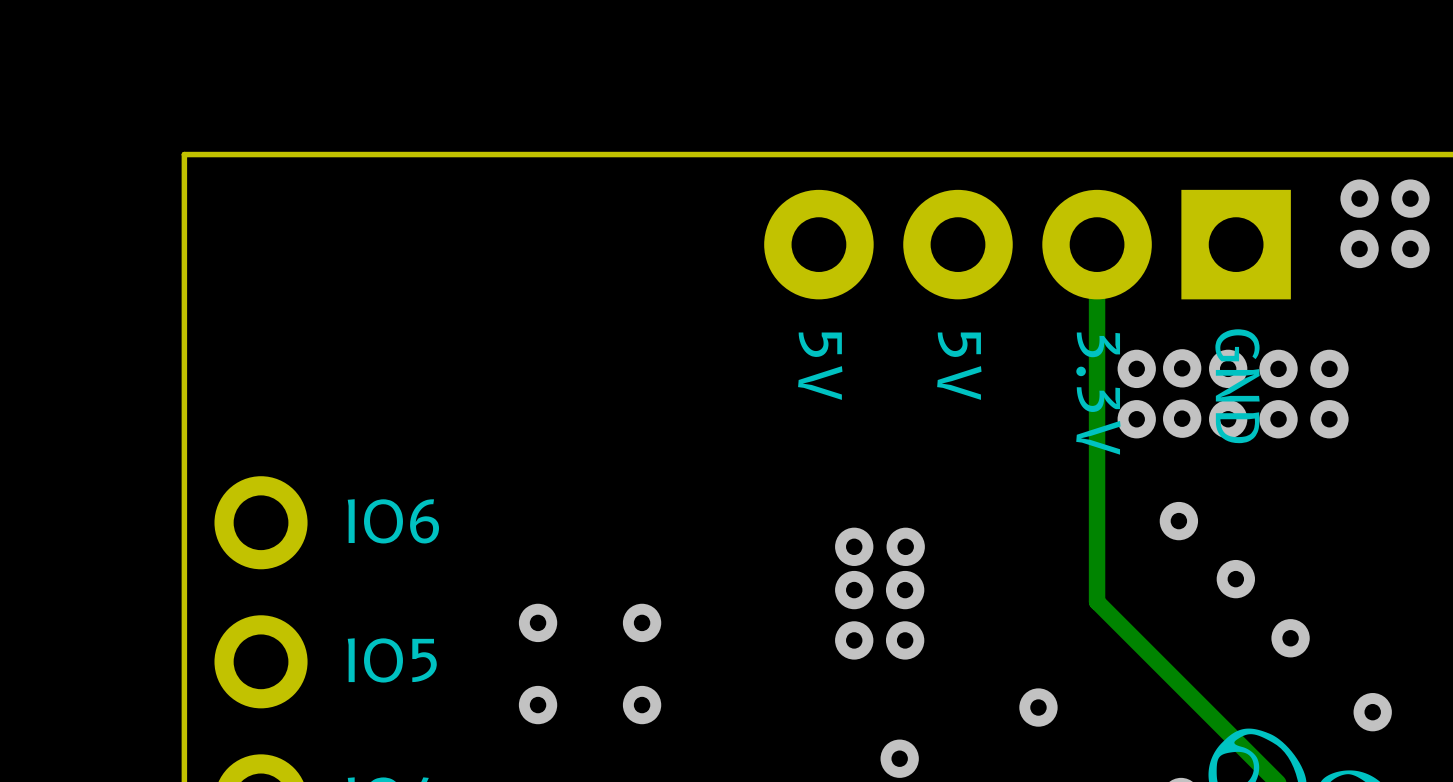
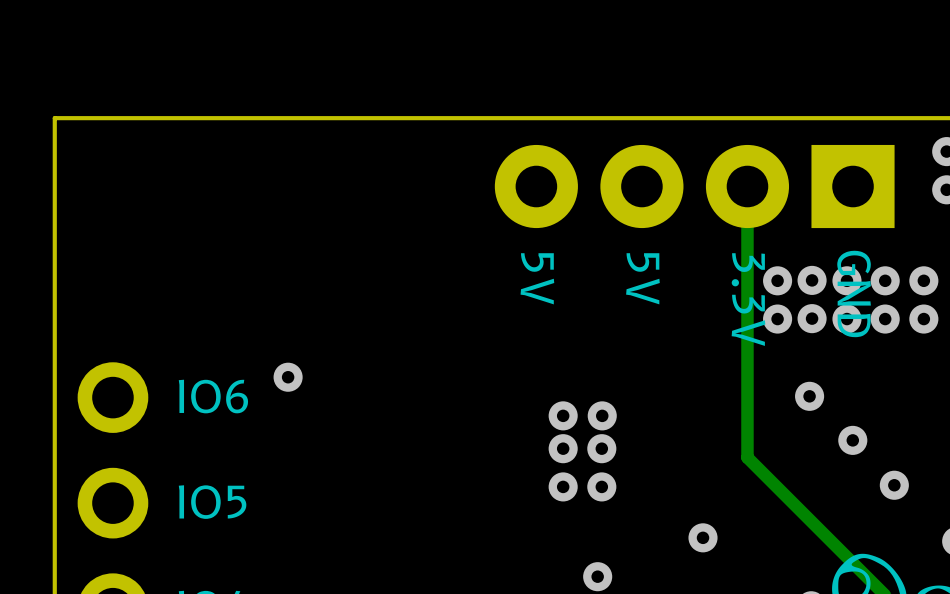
via: none -> (288, 377)
via: (538, 622) -> none
via: (642, 622) -> none
via: (538, 705) -> none
via: (642, 705) -> none

